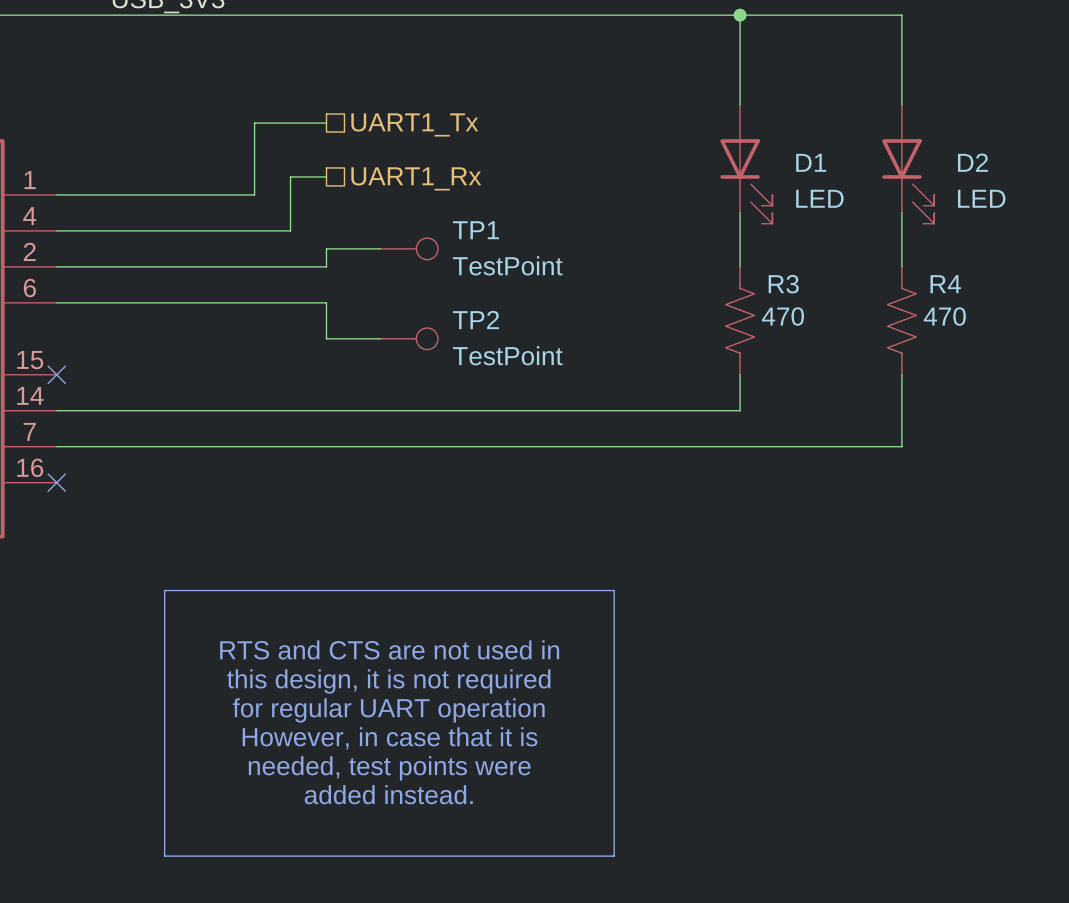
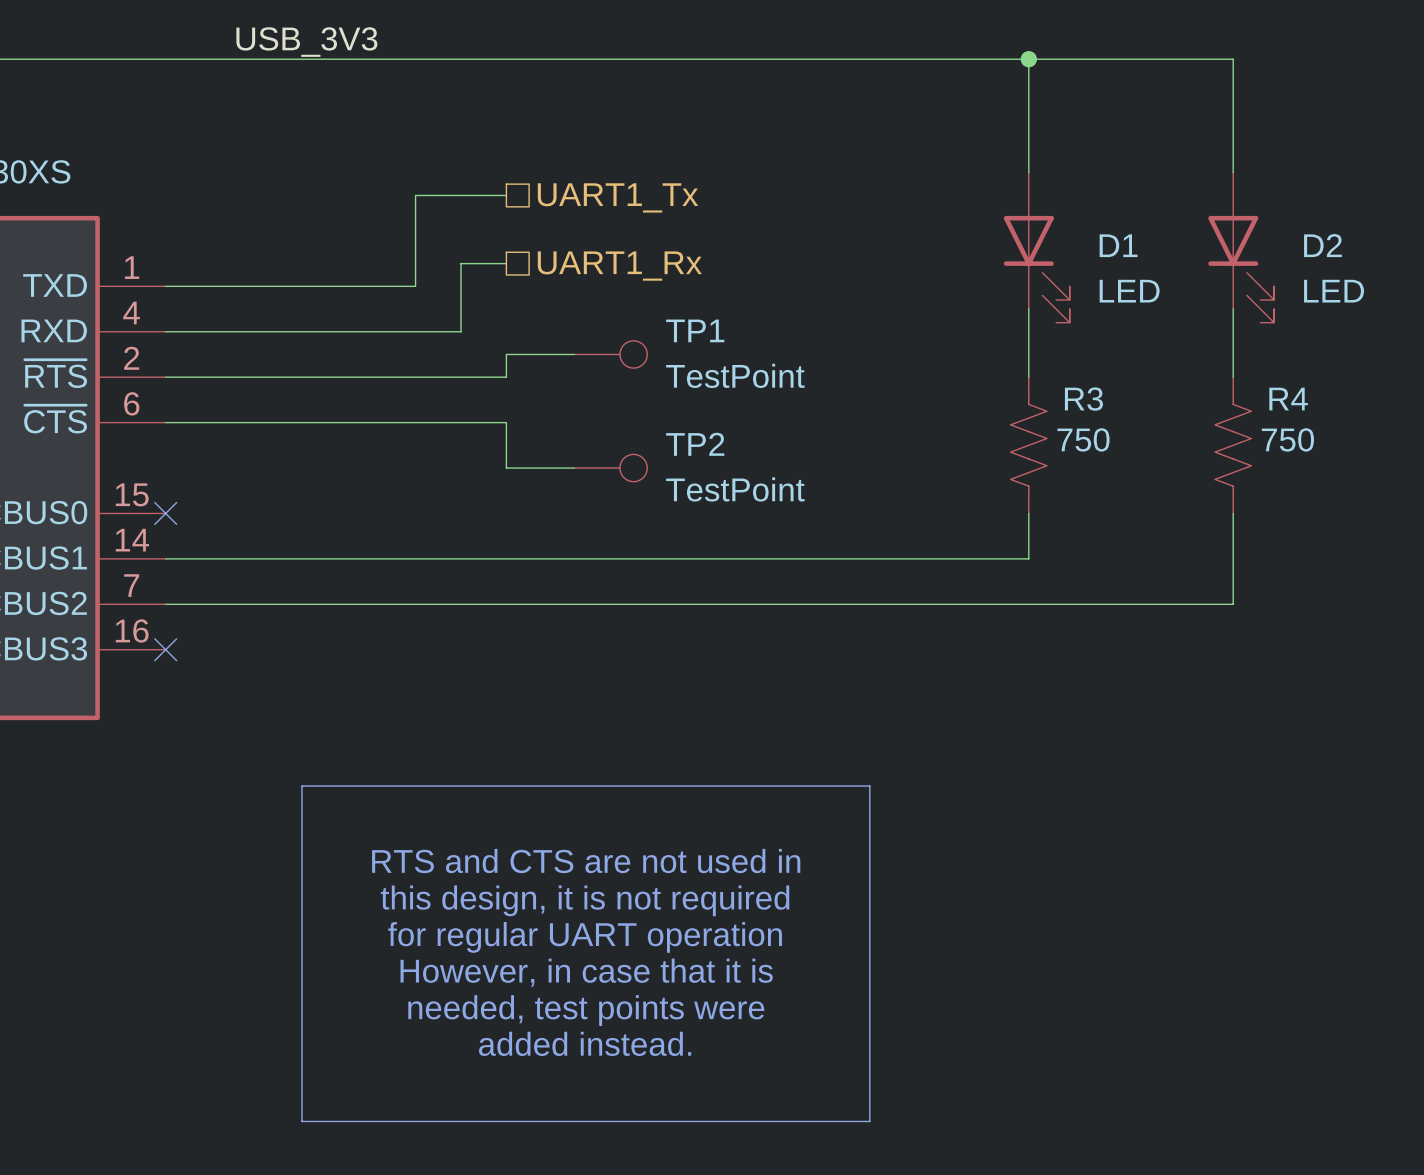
R3 value: 470 (783, 316) -> 750 (1083, 439)
R4 value: 470 (944, 316) -> 750 (1287, 439)

